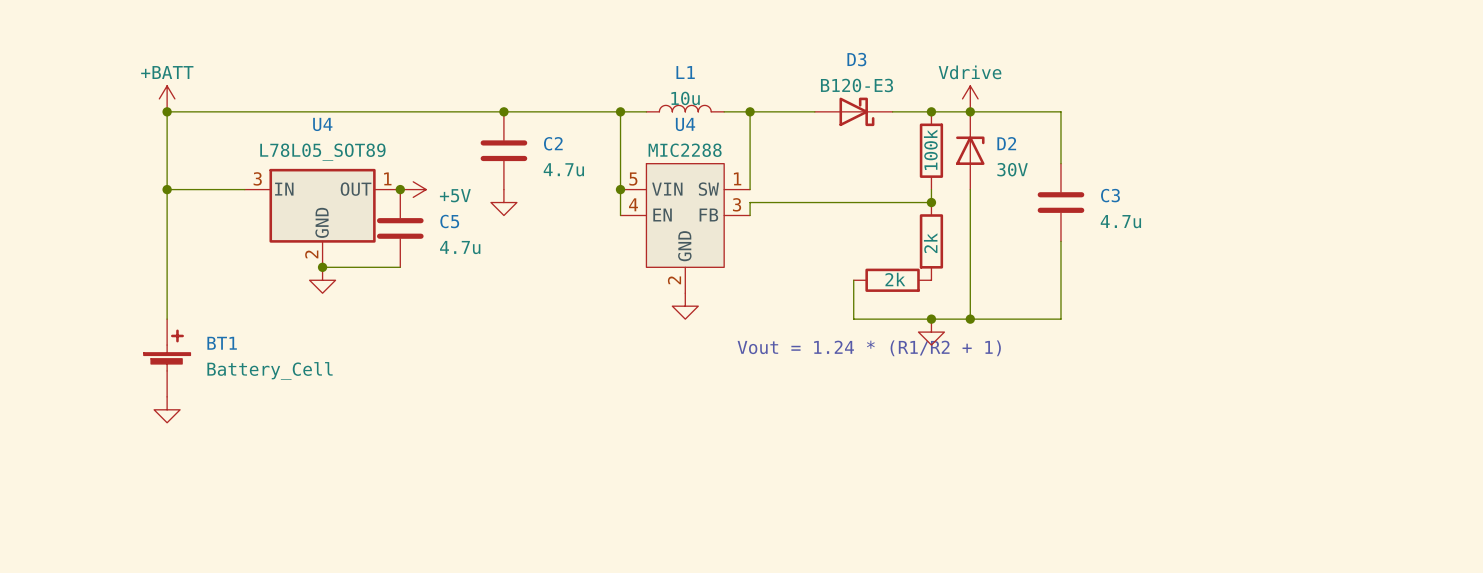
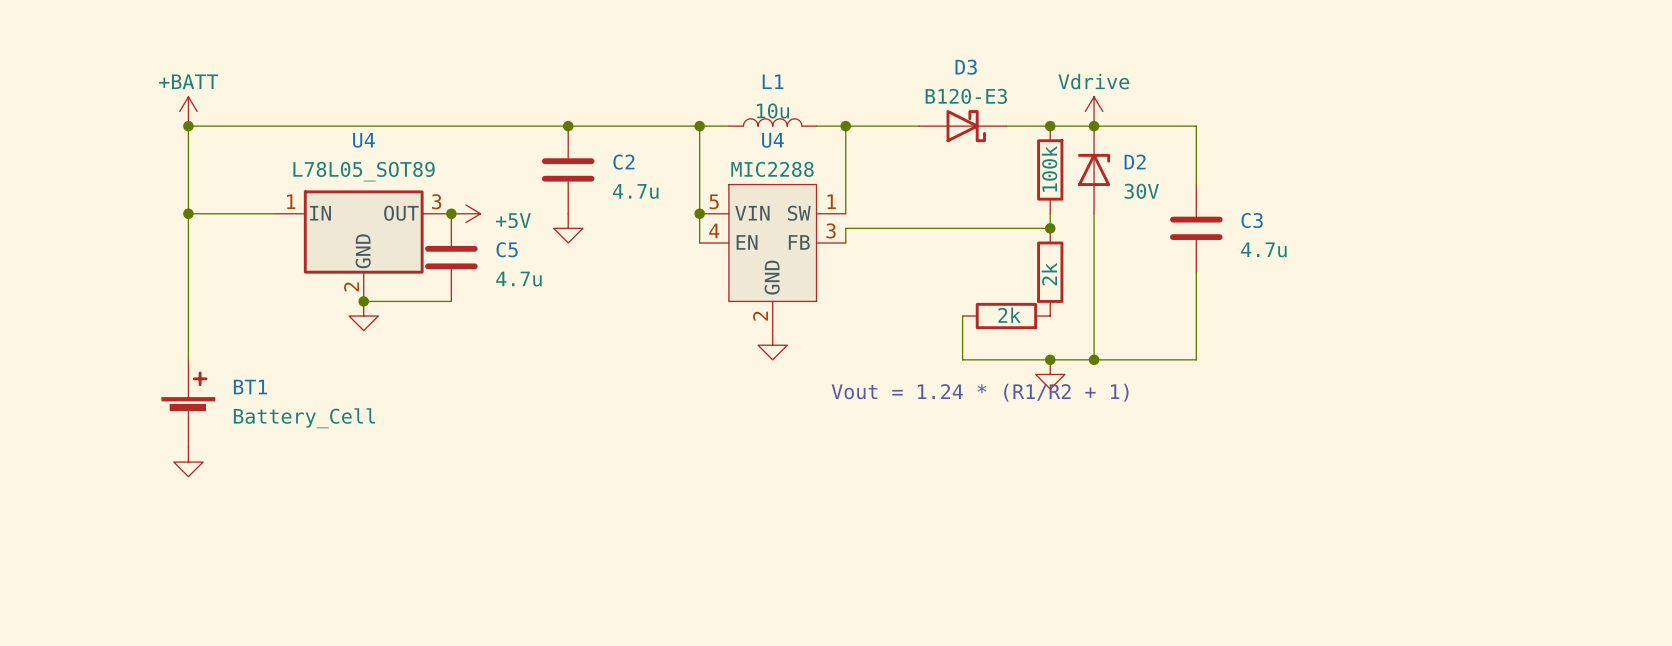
U4 pin number: 3 (257, 178) -> 1 (291, 201)
U4 pin number: 1 (387, 178) -> 3 (436, 201)

